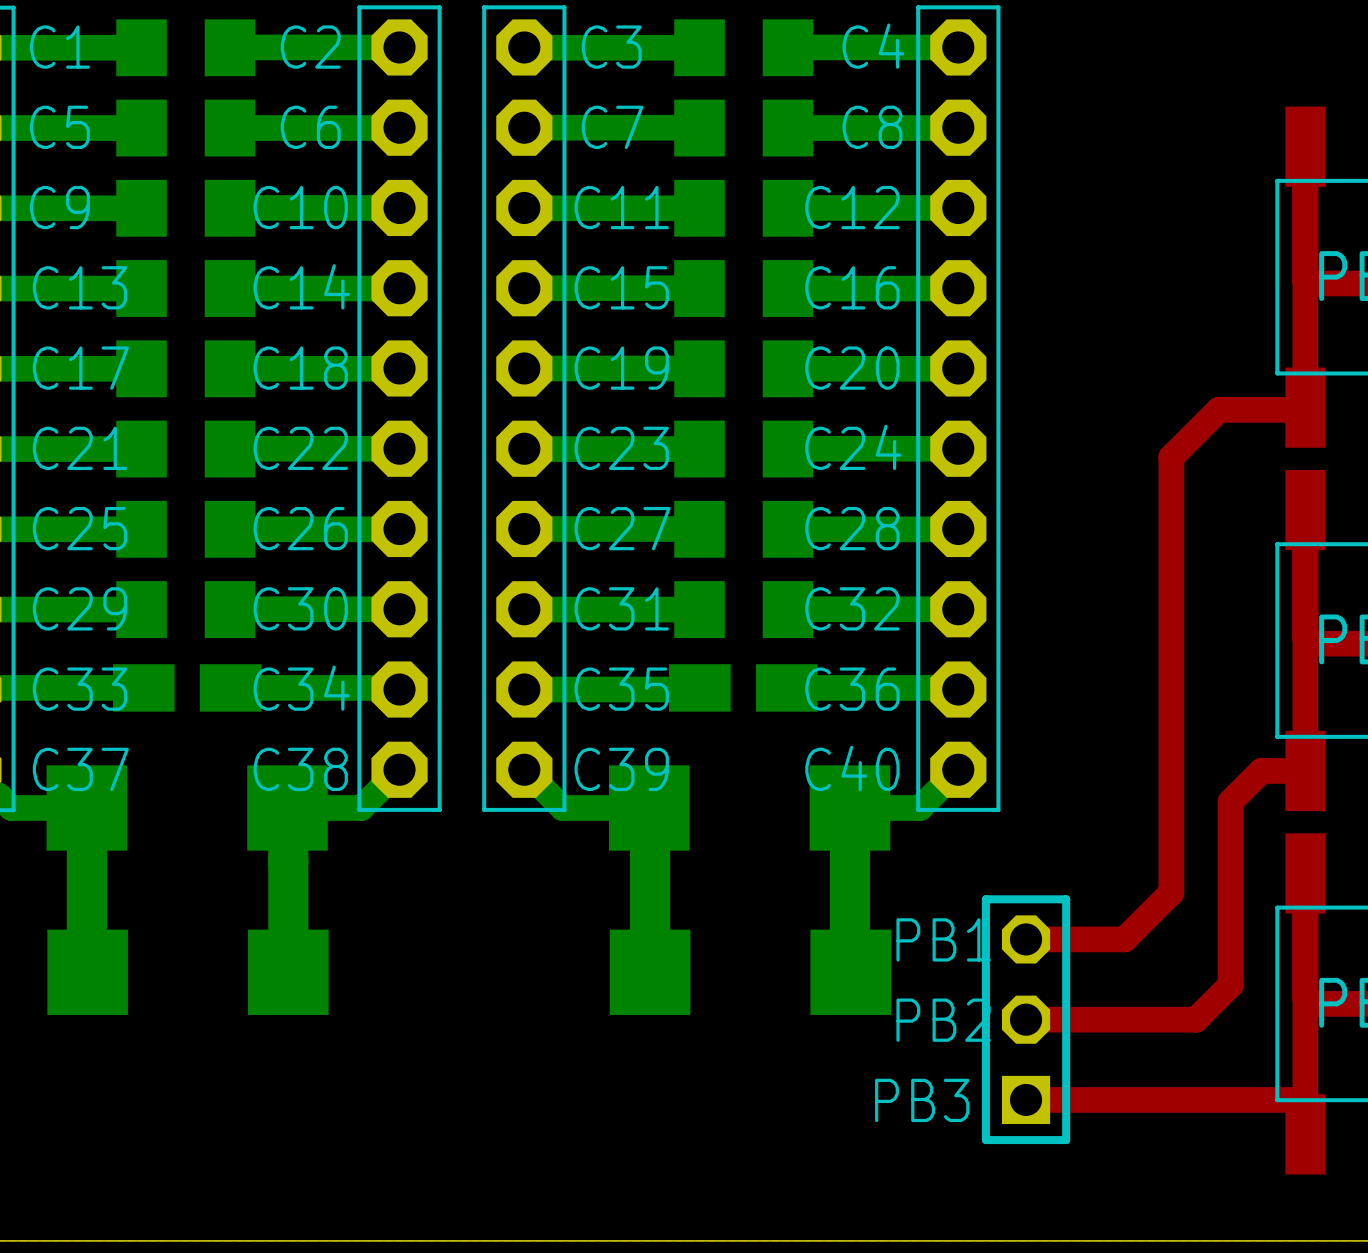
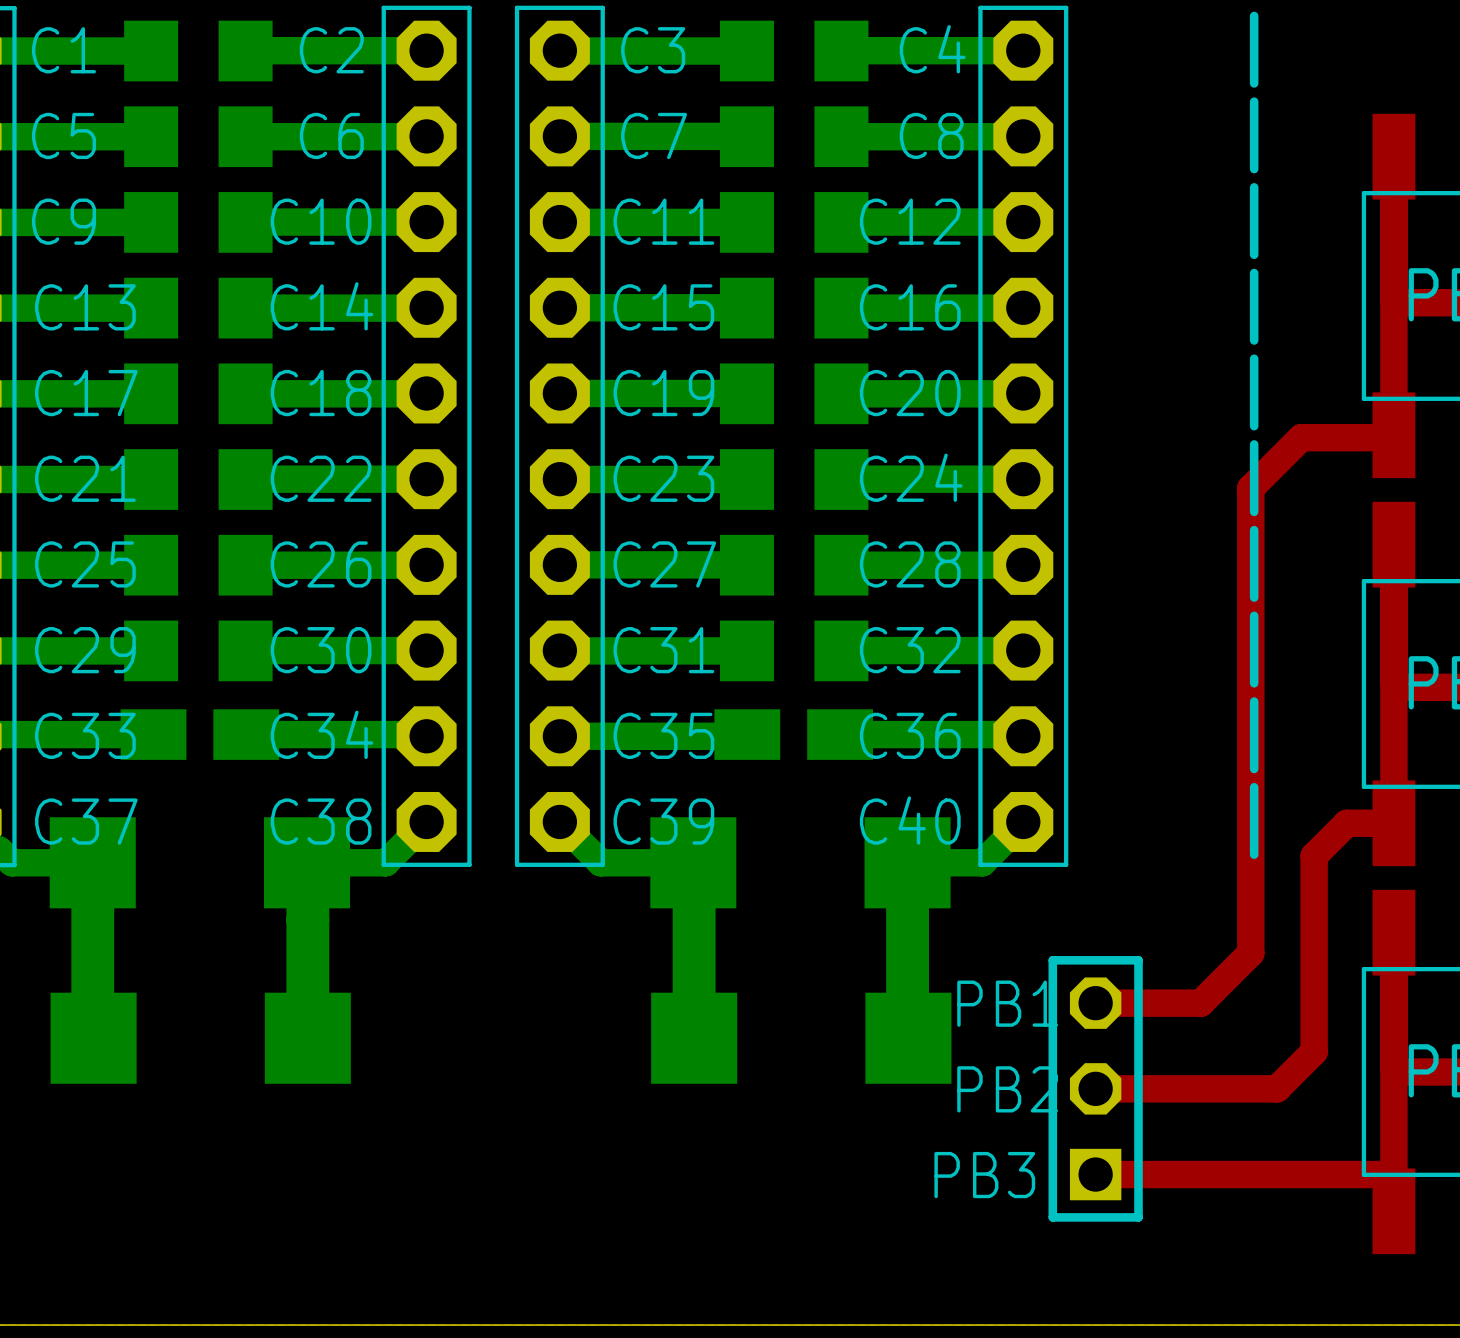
line: none -> (1254, 15) (1254, 83)
line: none -> (1254, 101) (1254, 169)
line: none -> (1254, 187) (1254, 254)
line: none -> (1254, 273) (1254, 340)
line: none -> (1254, 358) (1254, 426)
line: none -> (1254, 444) (1254, 511)
line: none -> (1254, 530) (1254, 597)
line: none -> (1254, 615) (1254, 683)
line: none -> (1254, 701) (1254, 769)
line: none -> (1254, 787) (1254, 854)

